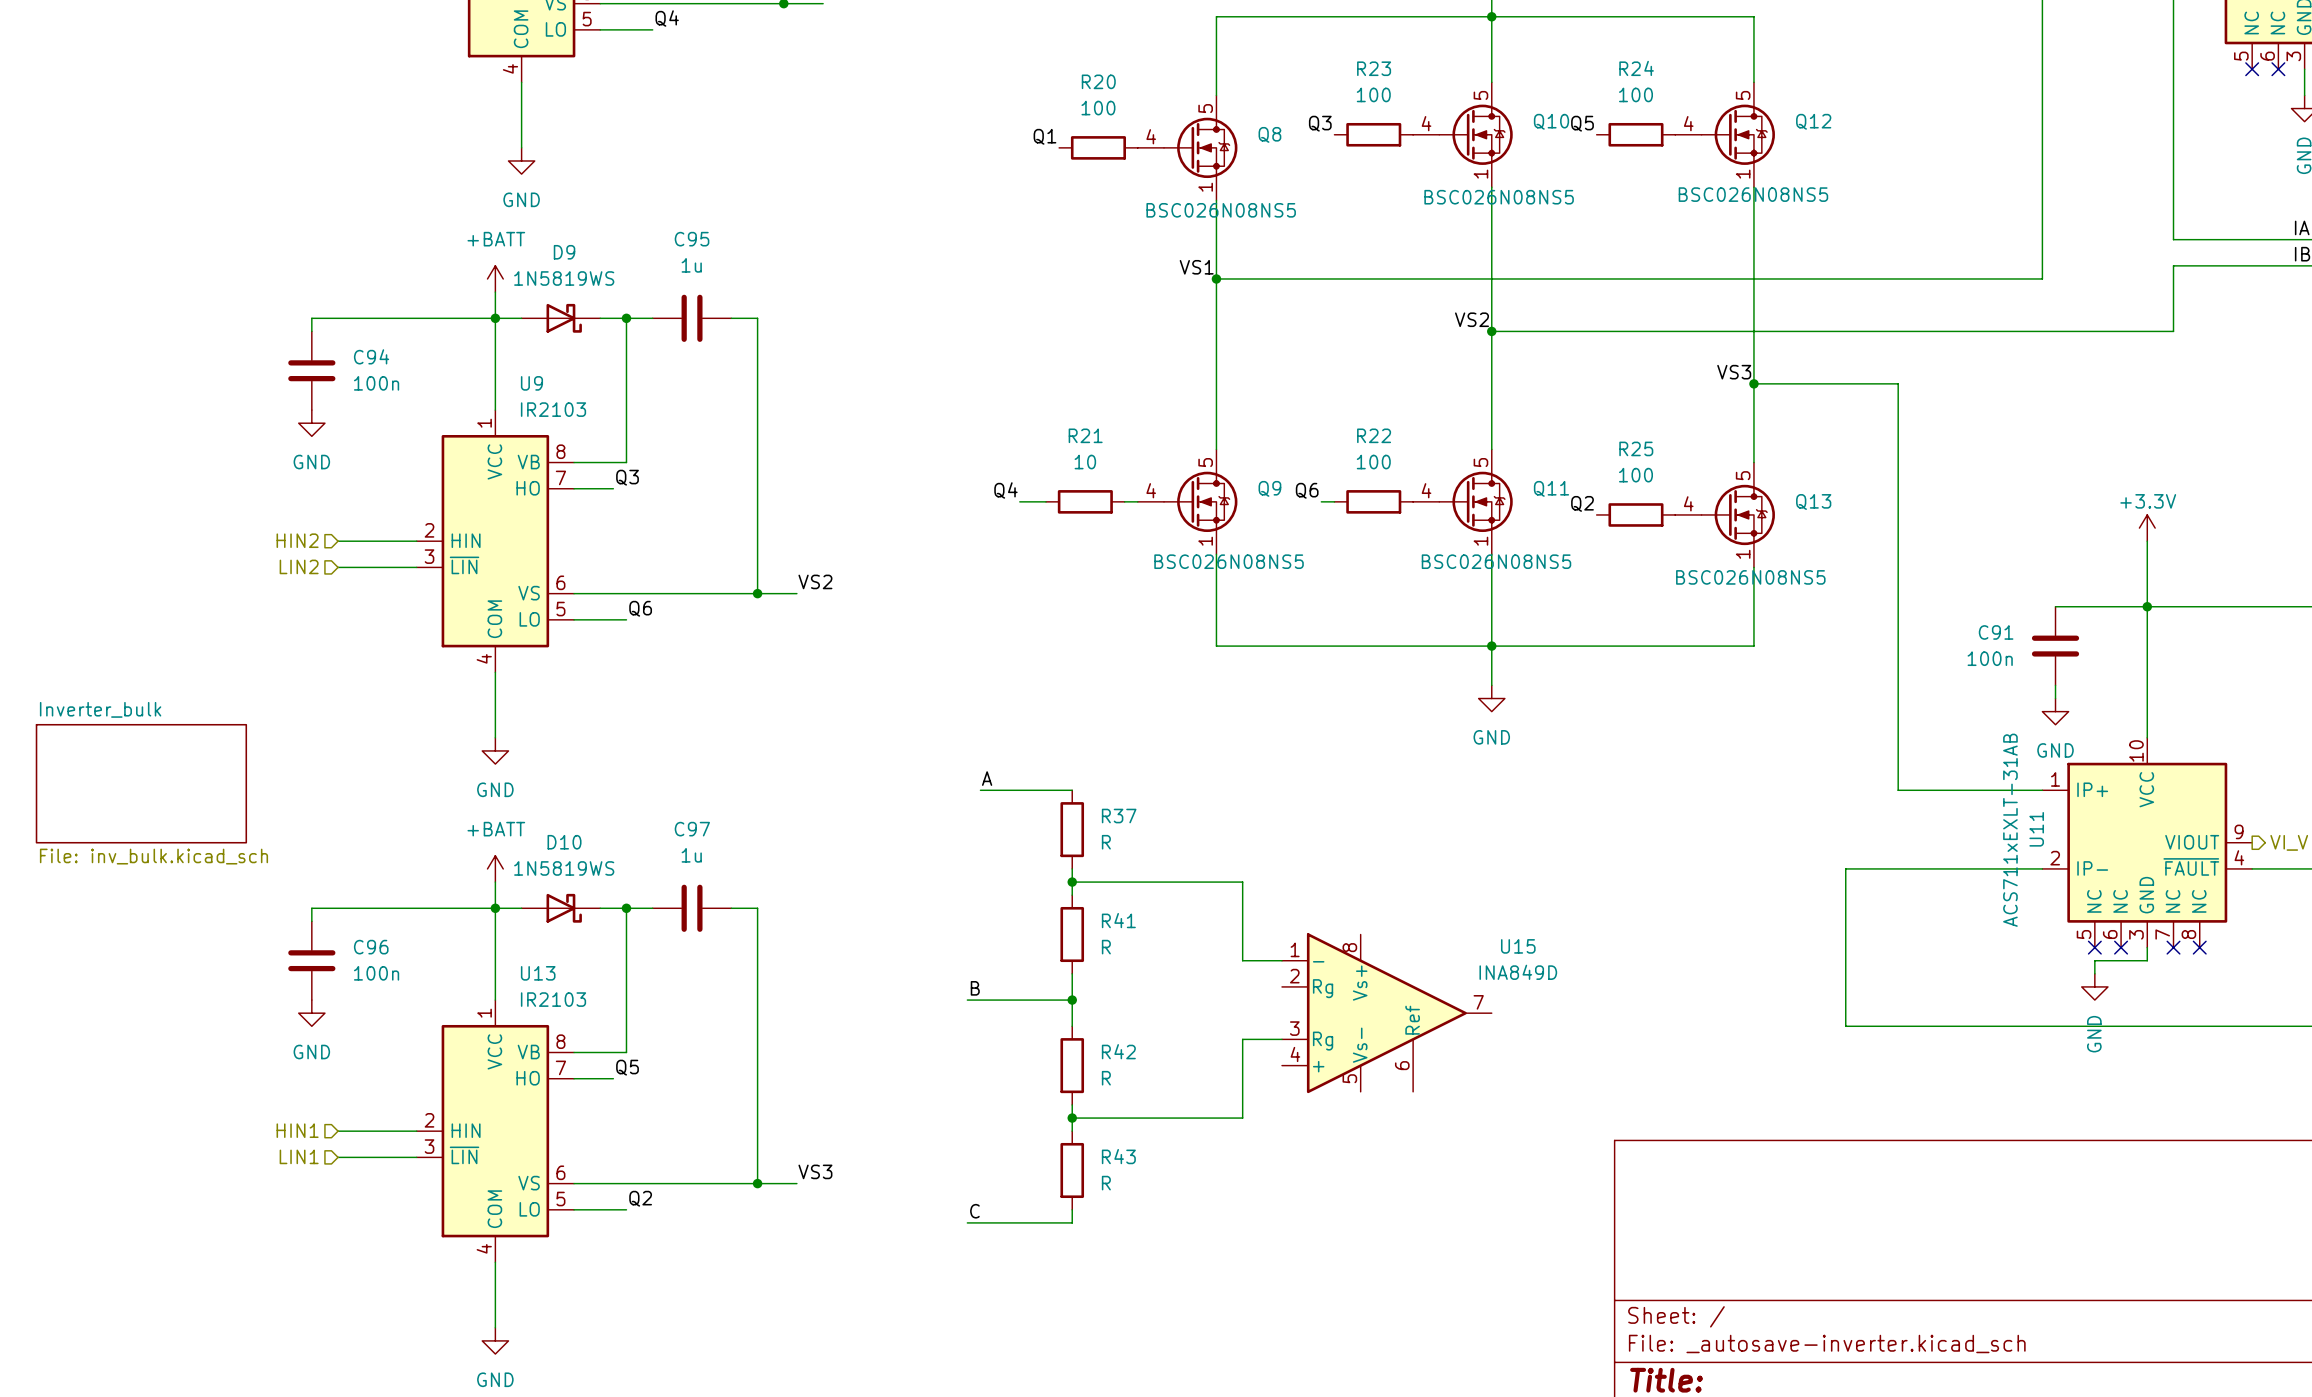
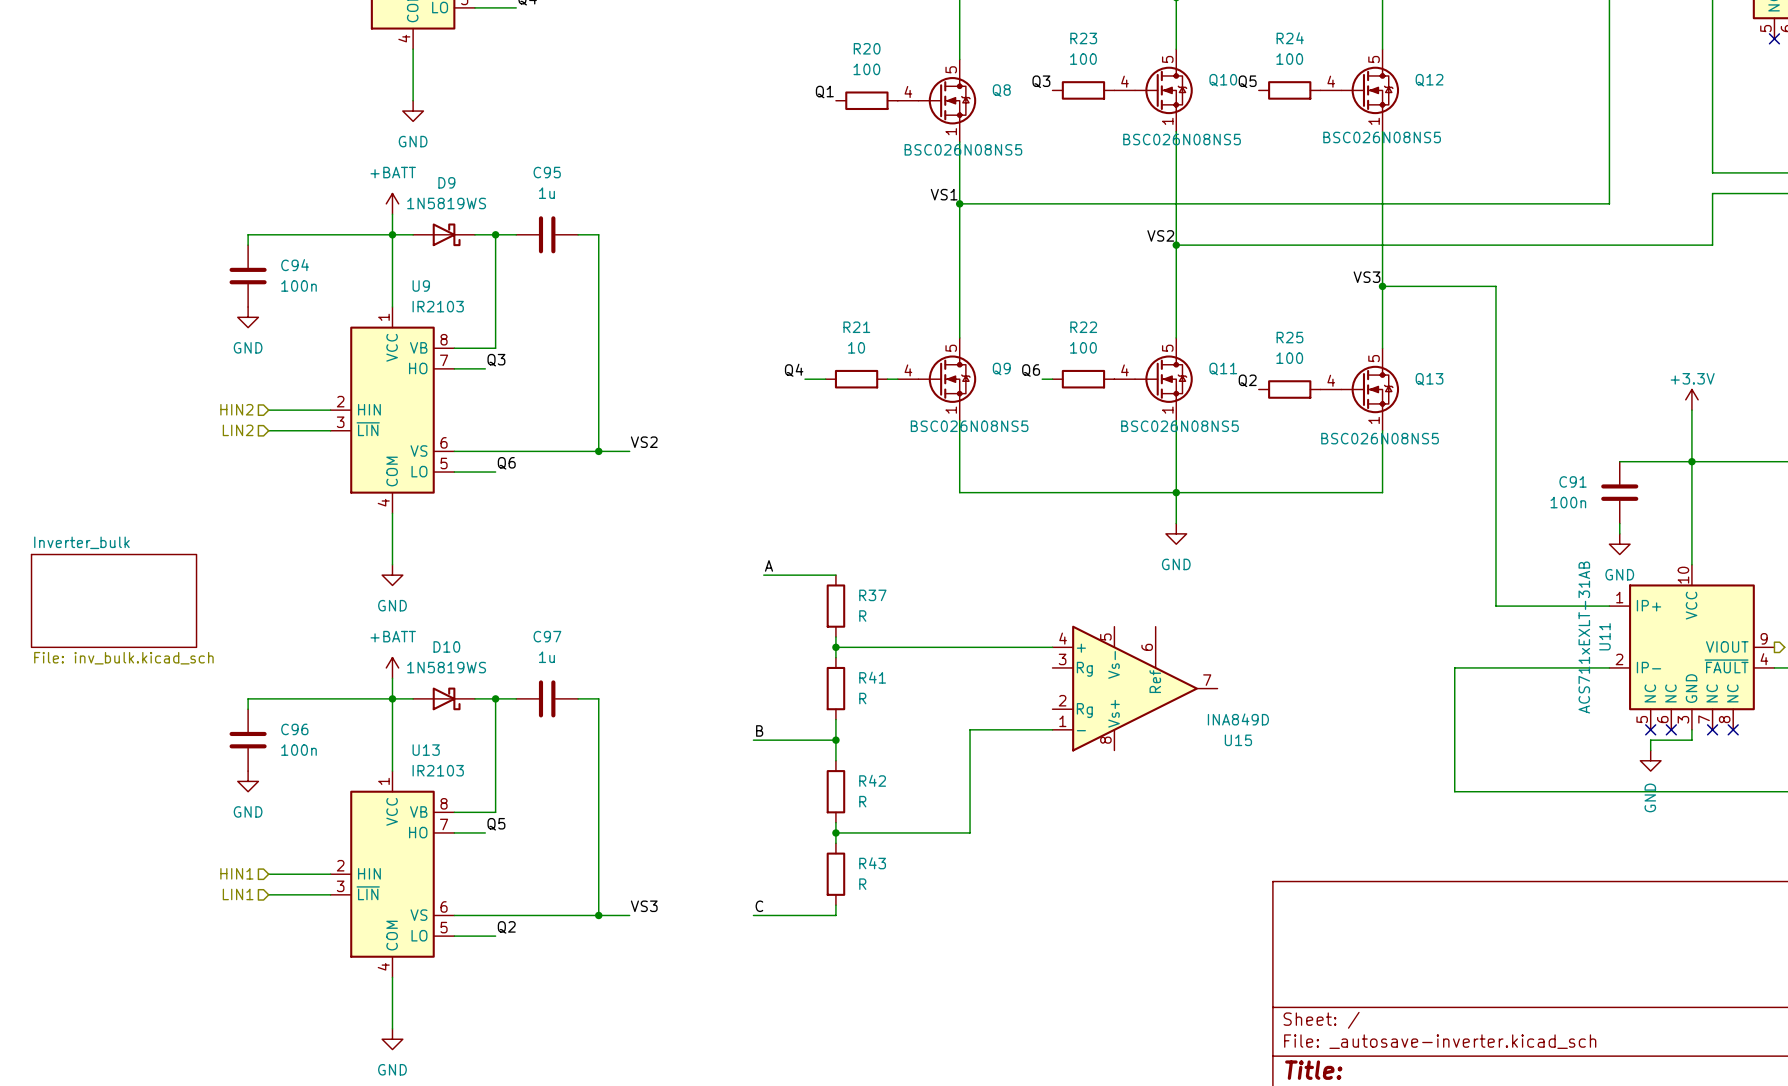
label position: A (987, 778) -> A (768, 565)
wire: (980, 790) (1072, 790) -> (763, 575) (835, 575)
R37 position: (1072, 829) -> (835, 606)
wire: none -> (835, 647) (1052, 647)
junction: none -> (835, 647)
wire: (1072, 868) (1072, 895) -> (835, 637) (835, 657)
wire: (1072, 882) (1242, 882) (1242, 960) (1282, 960) -> none
junction: (1072, 882) -> none
R41 position: (1072, 934) -> (835, 688)
wire: none -> (1052, 729) (970, 729) (970, 832) (835, 832)
junction: none -> (835, 740)
wire: (1072, 973) (1072, 1026) -> (835, 719) (835, 760)
label position: B (975, 988) -> B (759, 730)
wire: (967, 1000) (1072, 1000) -> (753, 740) (835, 740)
junction: (1072, 1000) -> none
U15 flip: as is (1386, 1013) -> up-down (1135, 688)
U15 position: (1386, 1013) -> (1135, 688)
wire: (1282, 1039) (1242, 1039) (1242, 1118) (1072, 1118) -> none
R42 position: (1072, 1065) -> (835, 791)
junction: none -> (835, 832)
wire: (1072, 1104) (1072, 1131) -> (835, 822) (835, 843)
junction: (1072, 1118) -> none
R43 position: (1072, 1170) -> (835, 874)
wire: (1072, 1209) (1072, 1222) (967, 1222) -> (835, 905) (835, 915) (753, 915)
label position: C (974, 1211) -> C (759, 906)

